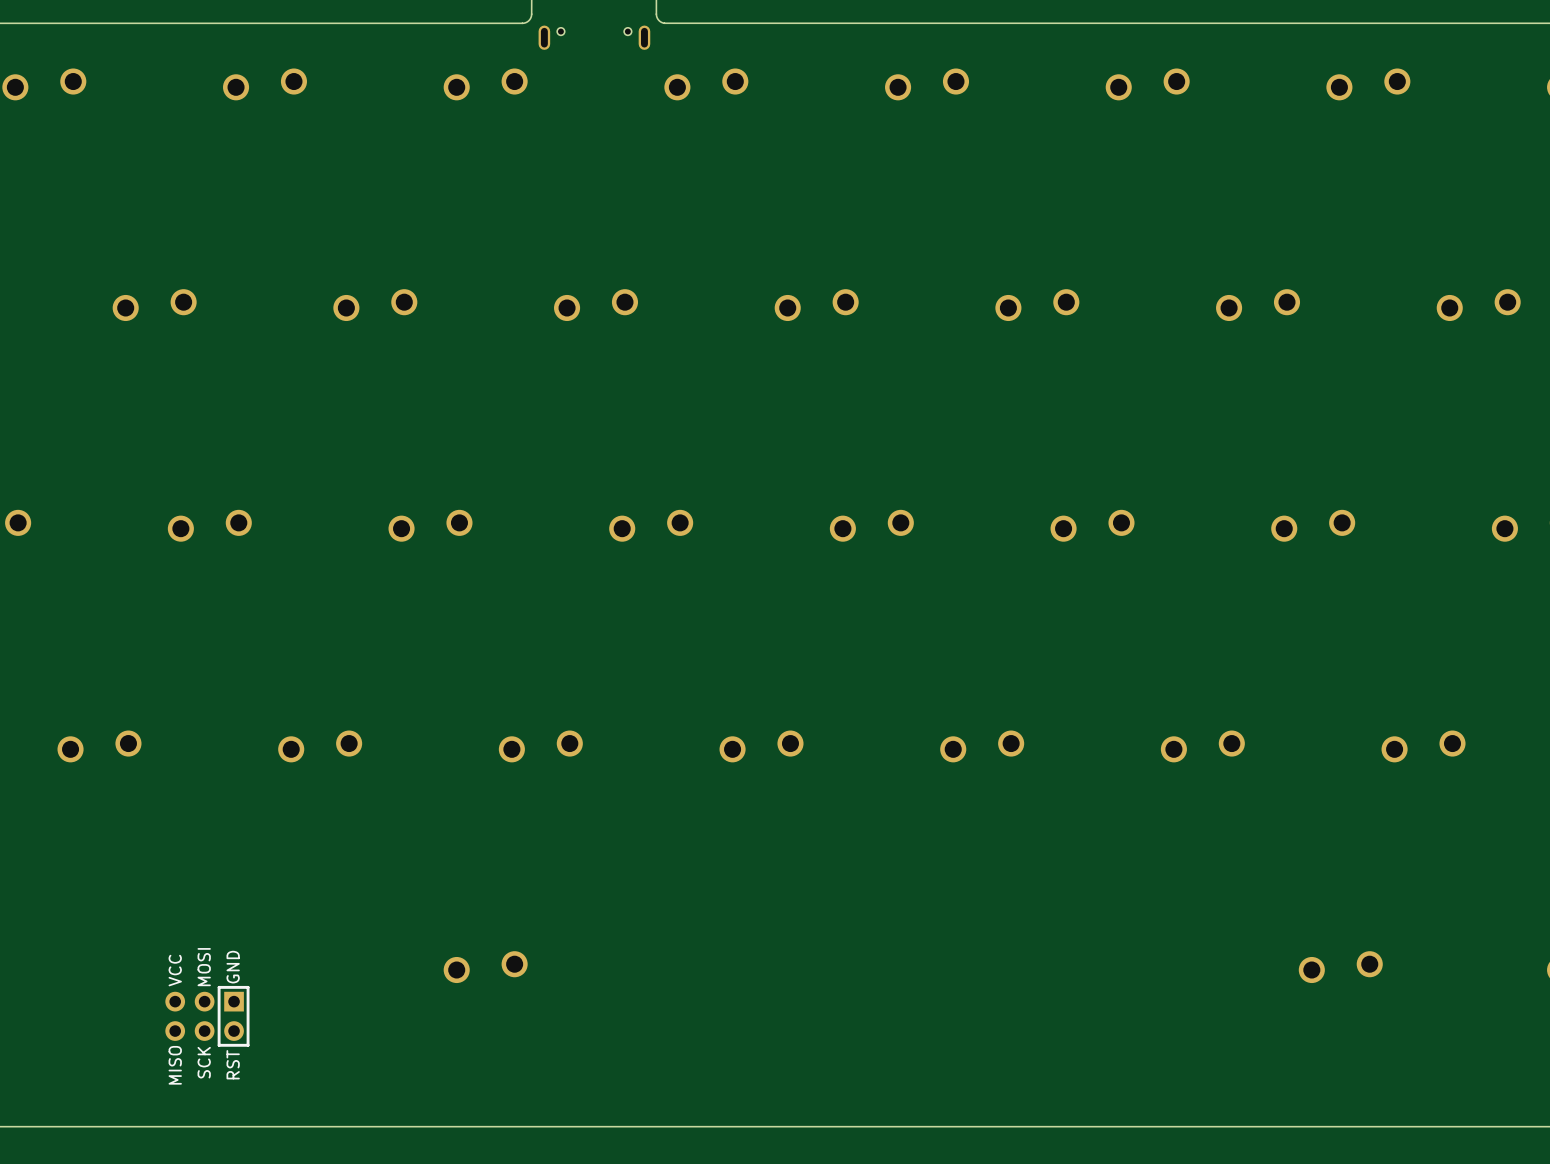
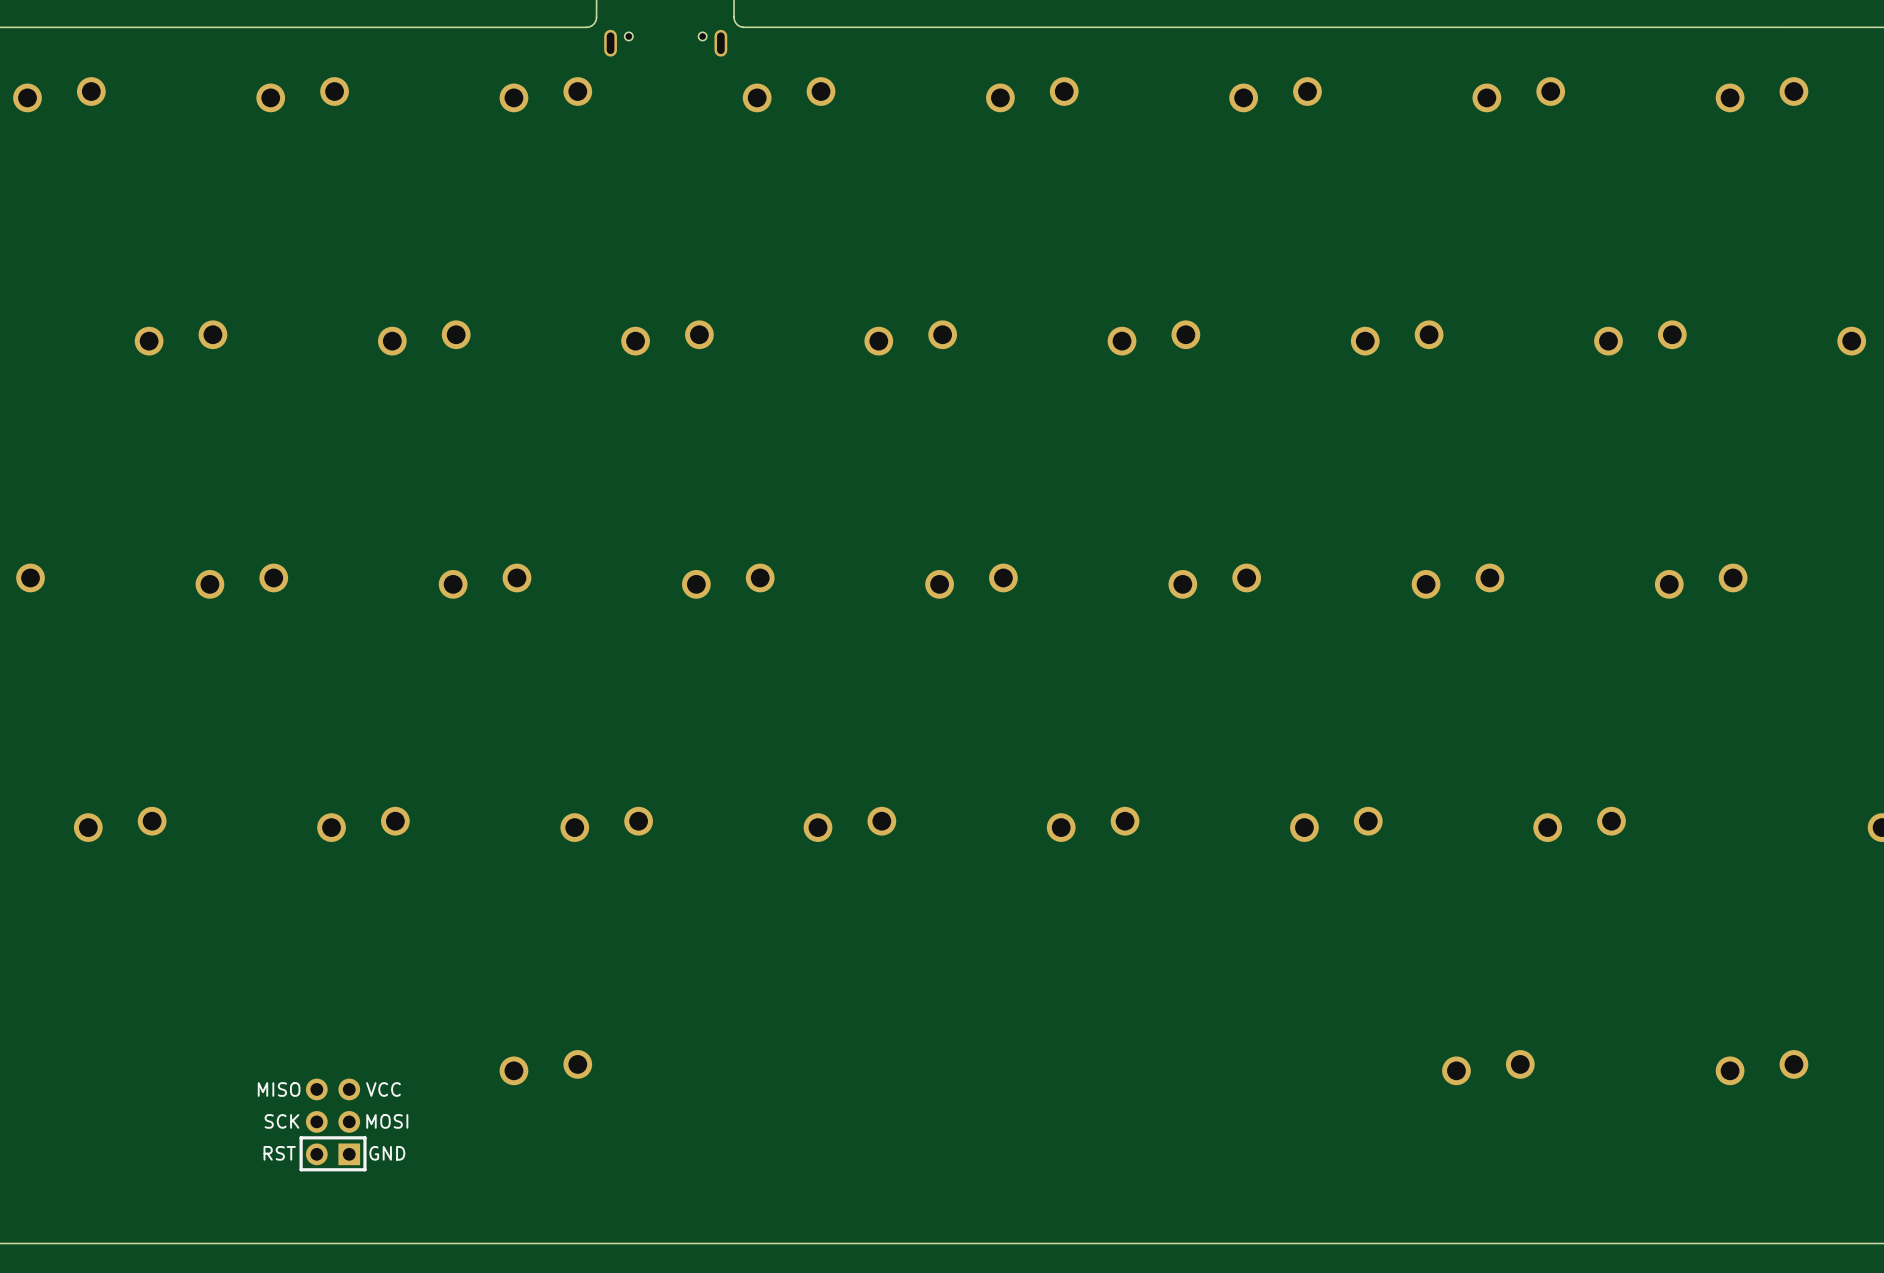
part rotation: 0° (207, 1016) -> 90° clockwise (333, 1124)
part position: (207, 1016) -> (333, 1124)

